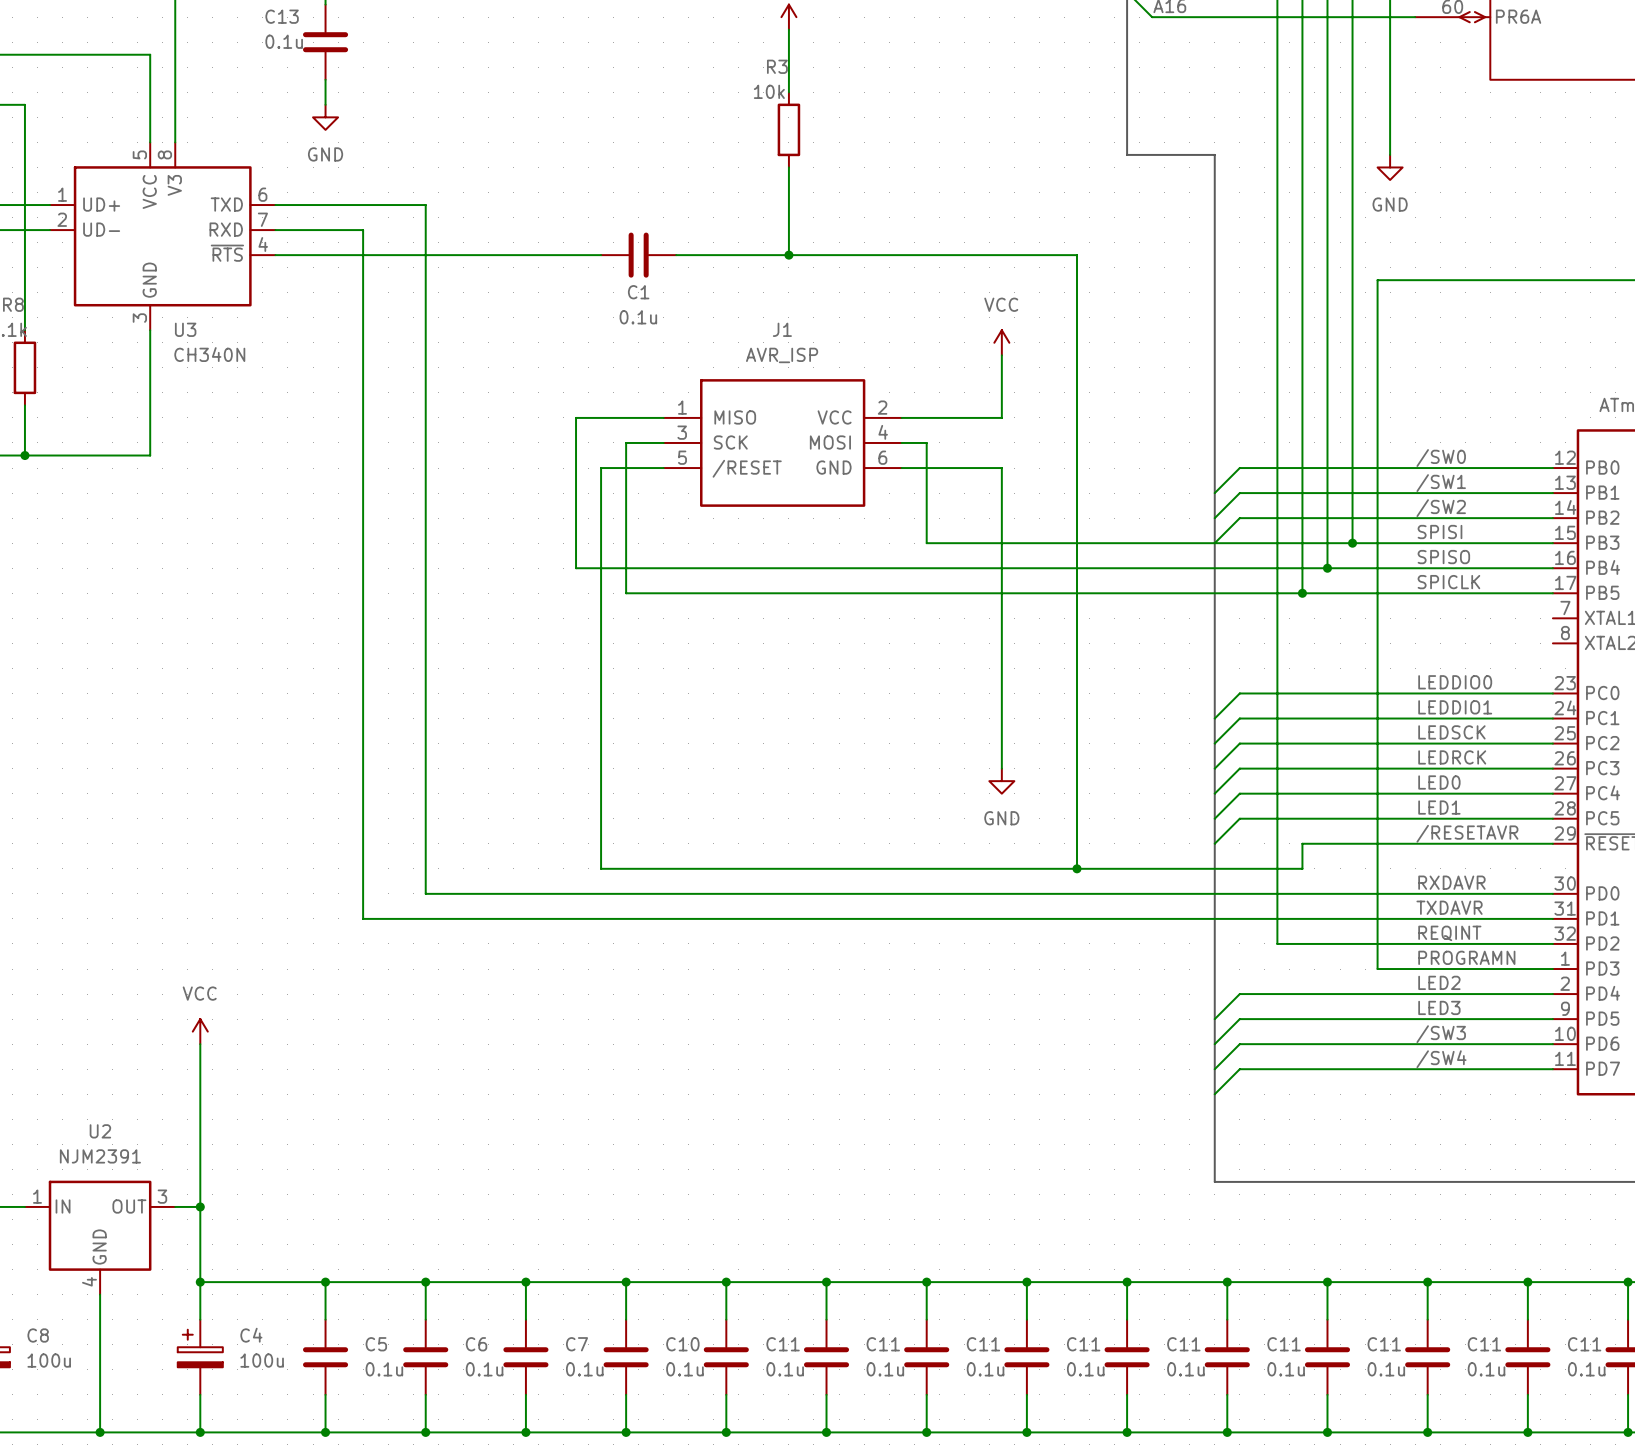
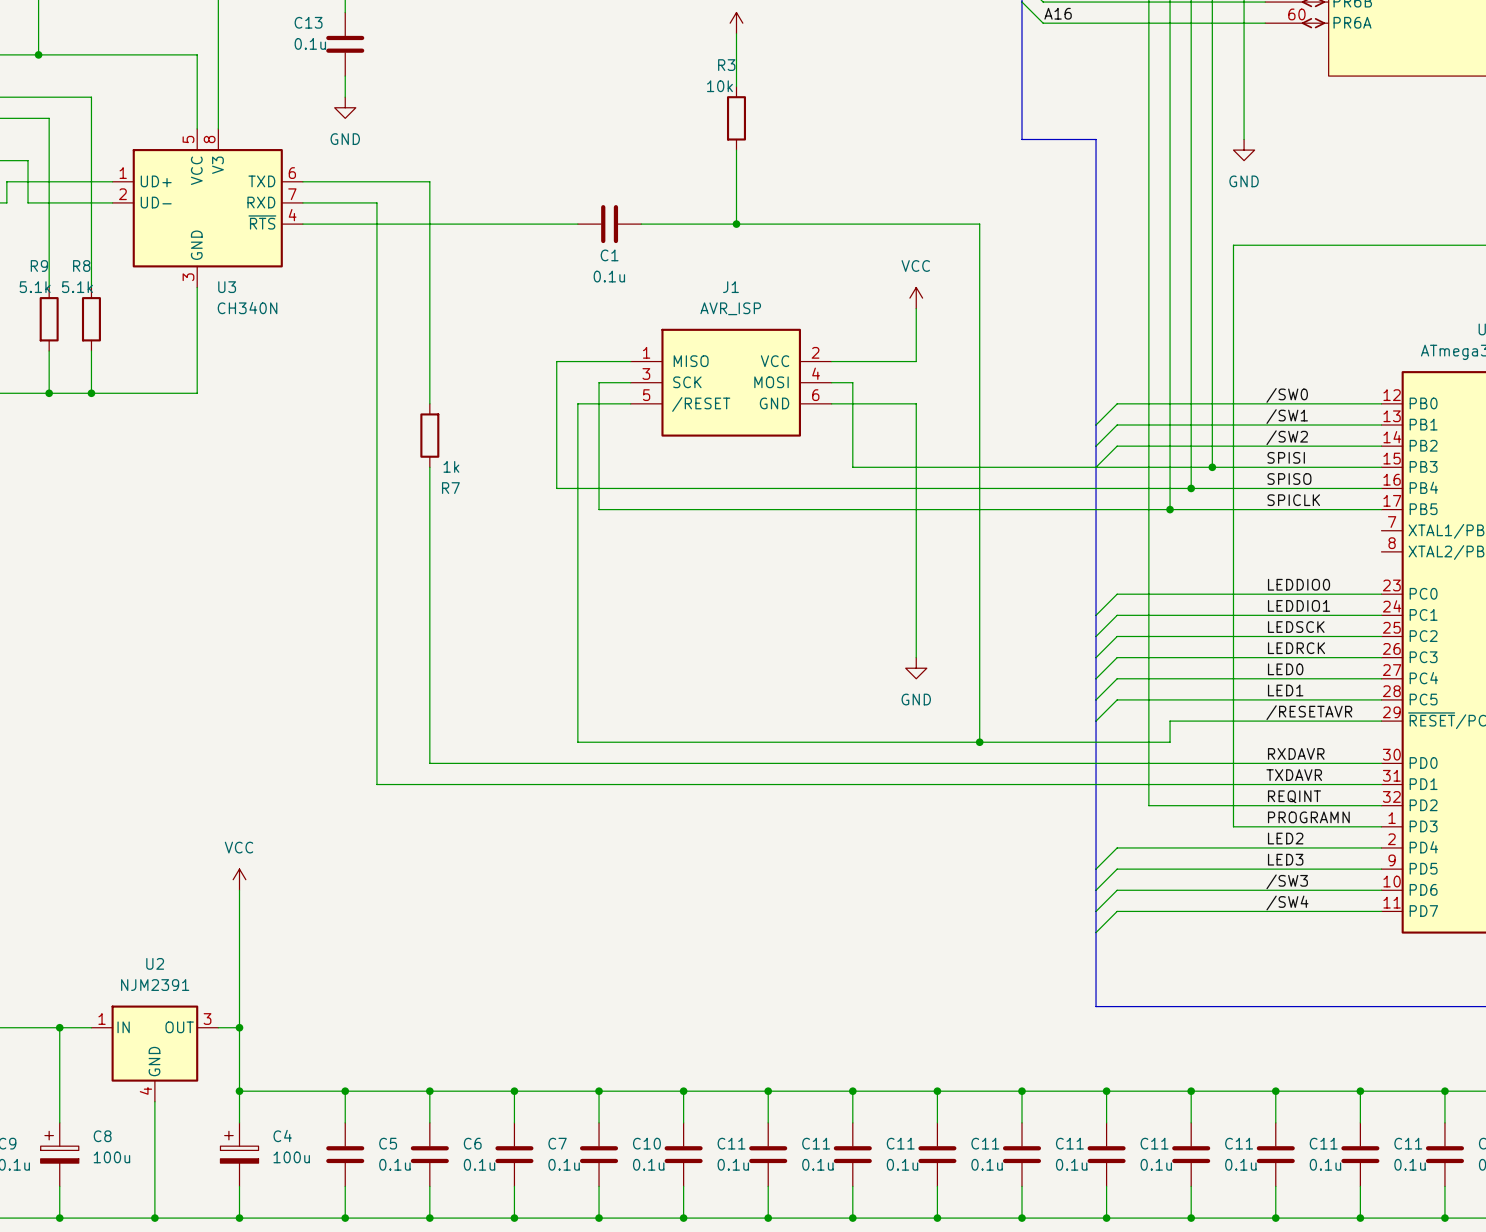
wire: (425, 468) (425, 543) -> none
R7: none -> 1k (429, 435)

